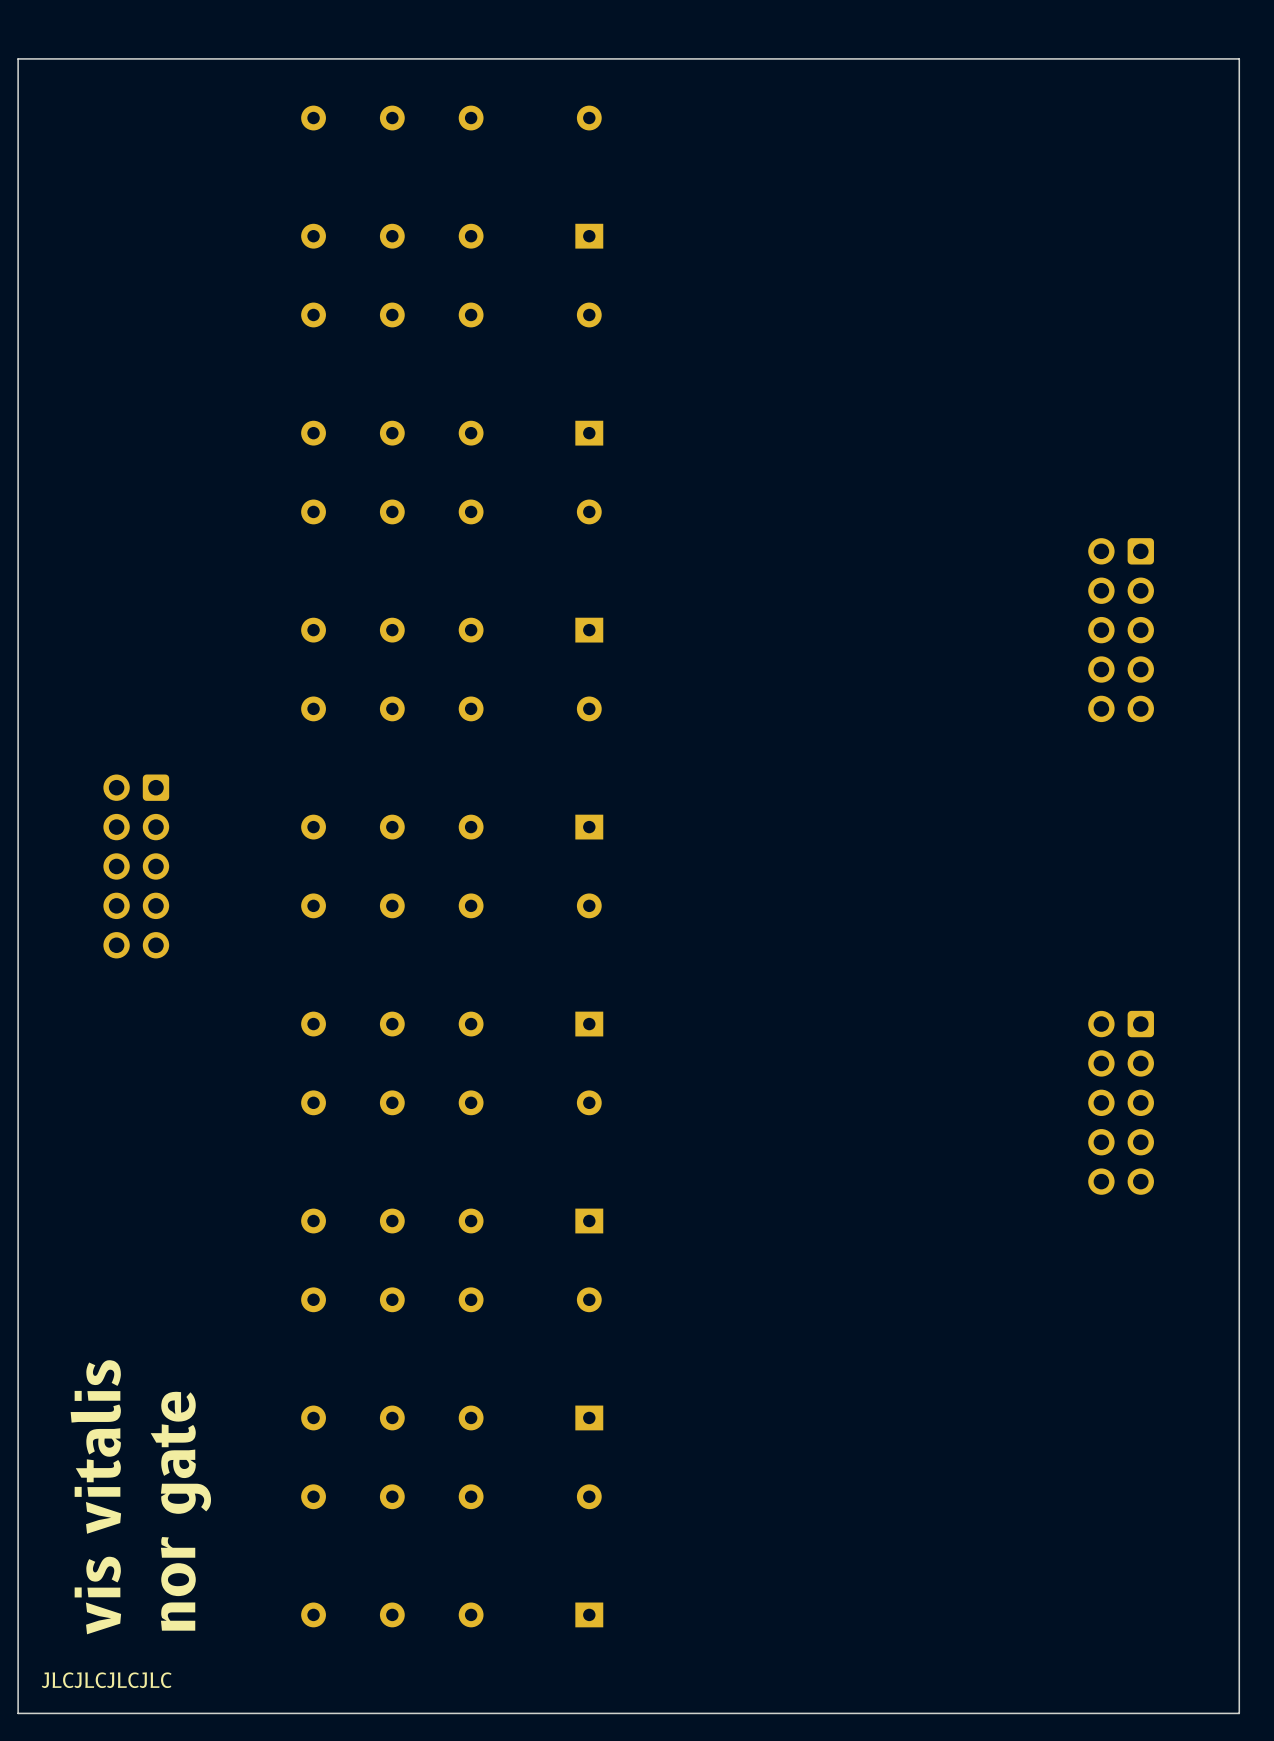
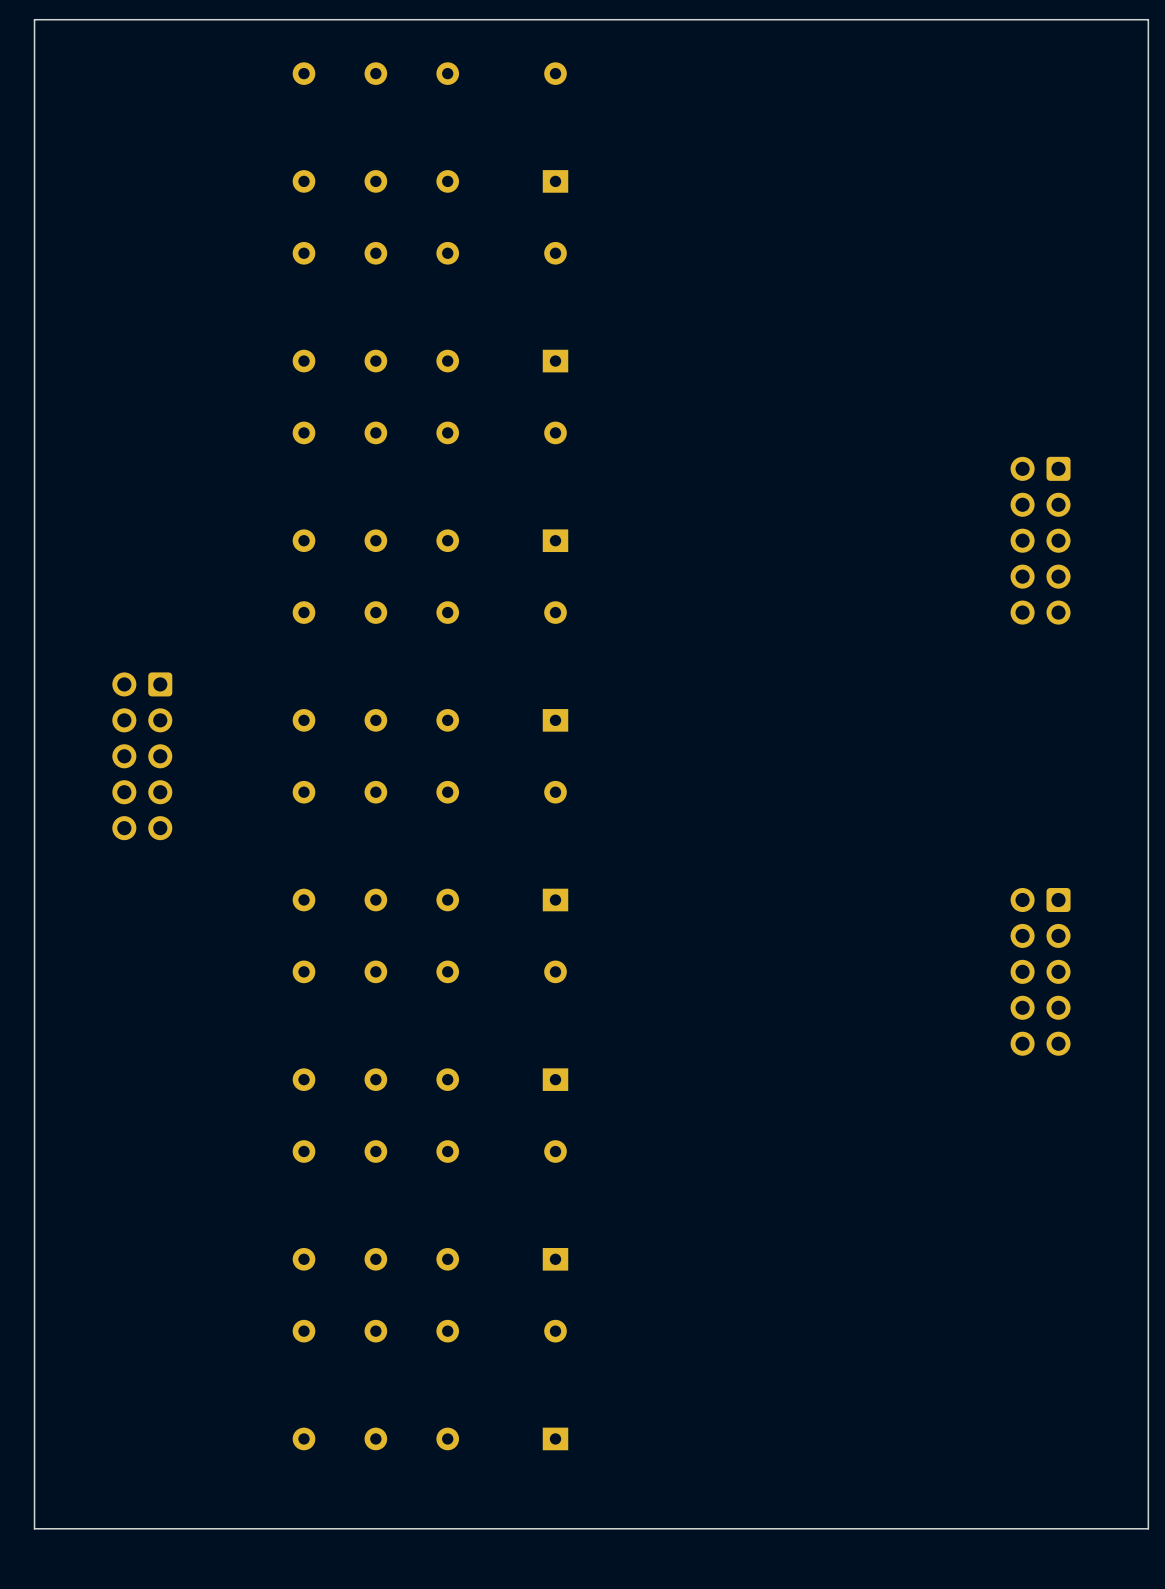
text: vis vitalis (95, 1497) -> none
text: nor gate (180, 1511) -> none
text: JLCJLCJLCJLC (106, 1680) -> none

